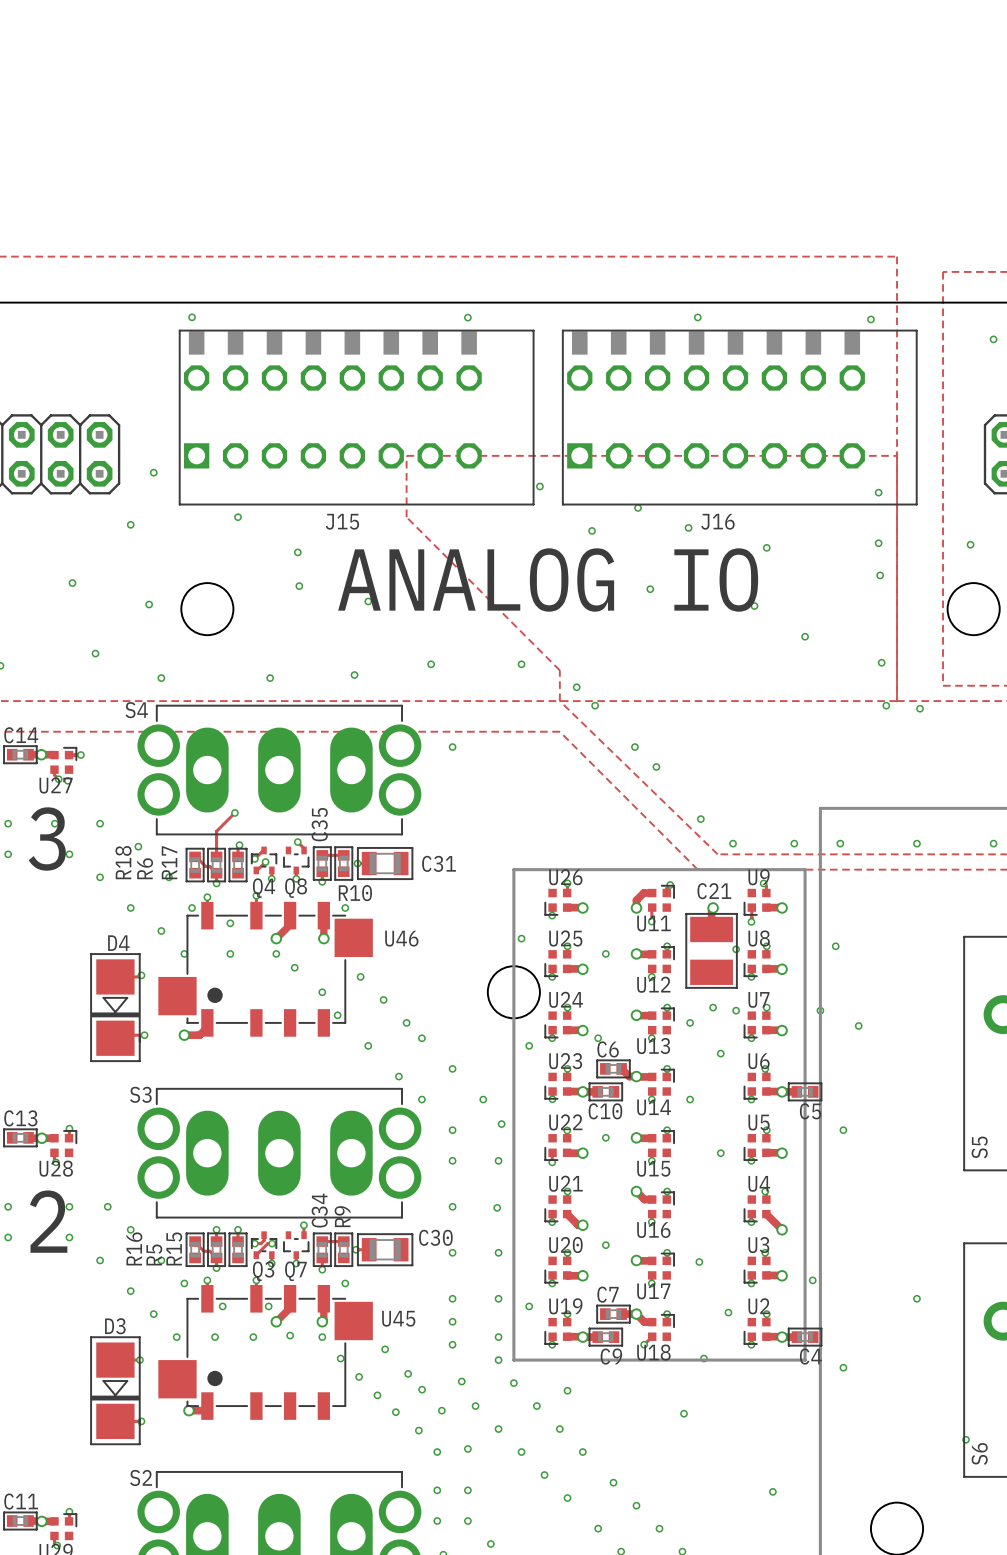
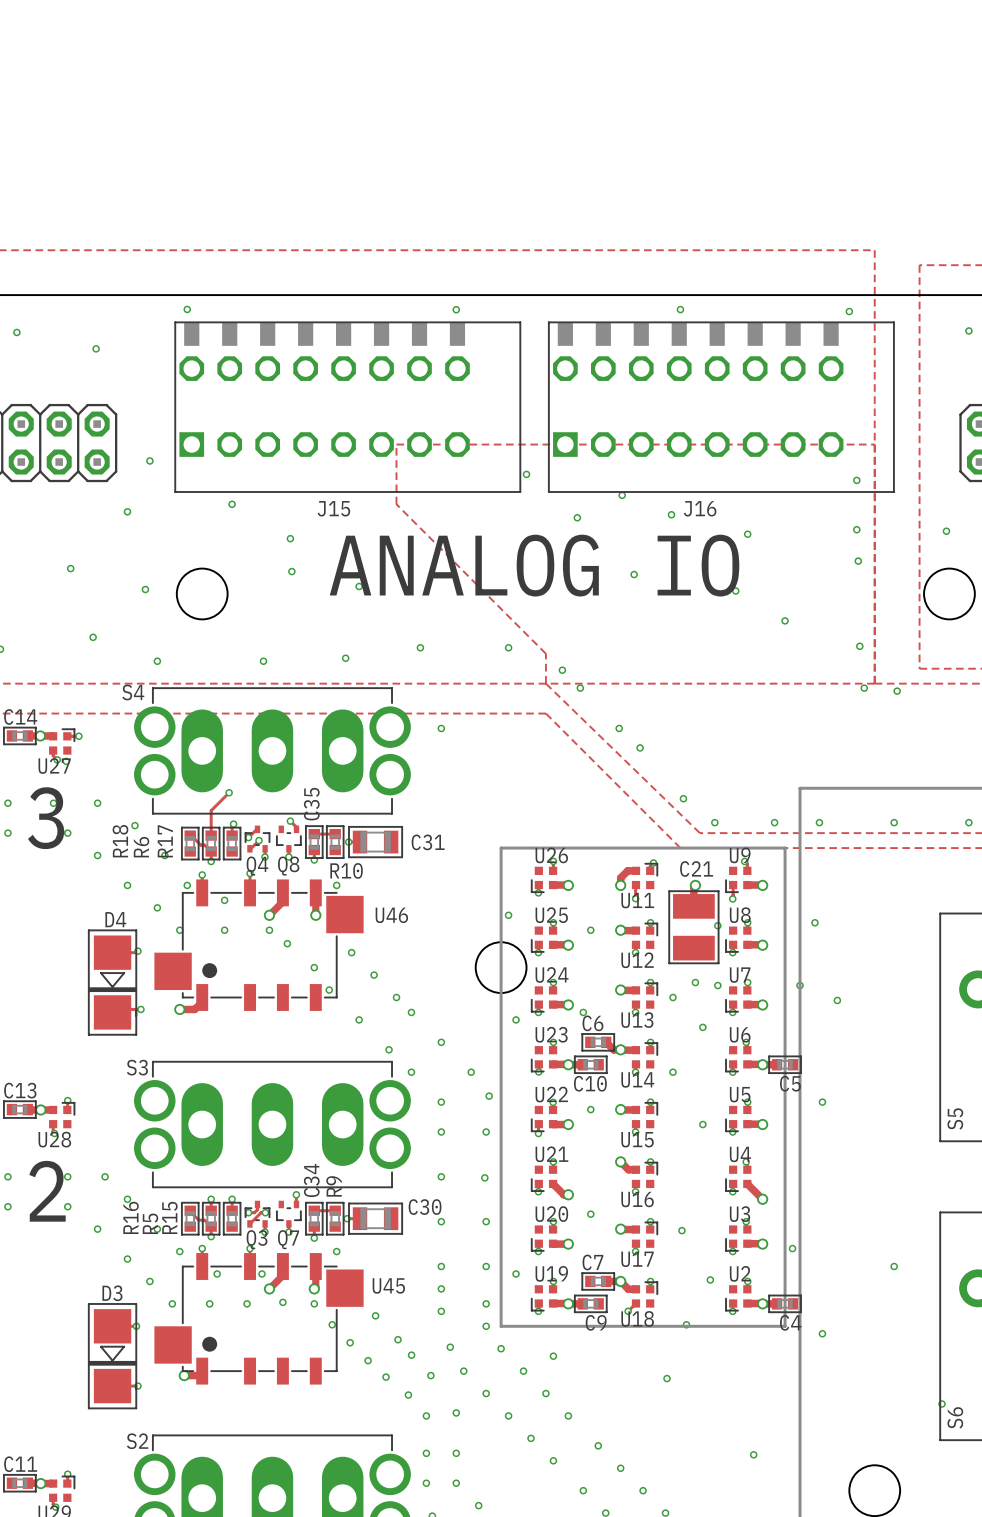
via: none -> (16, 332)
via: none -> (96, 348)

